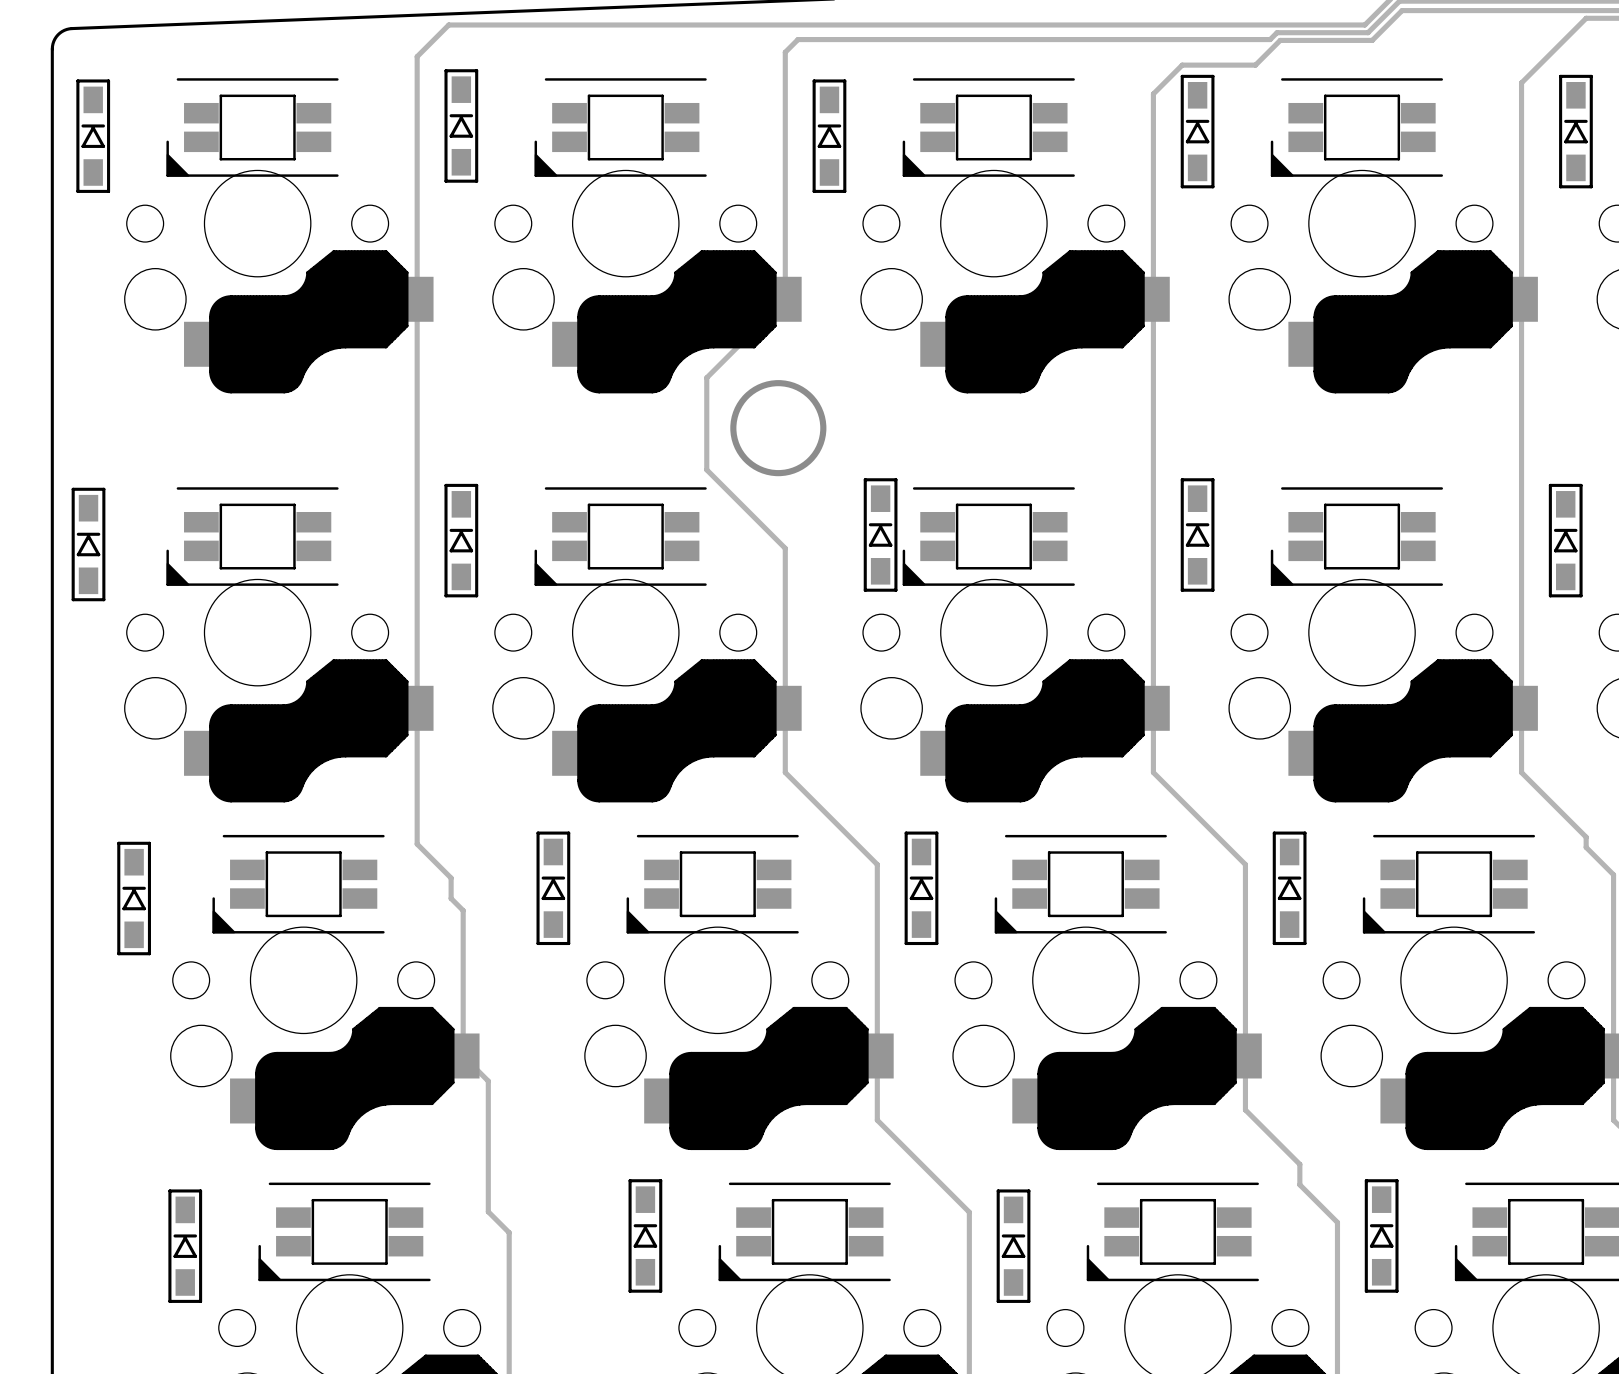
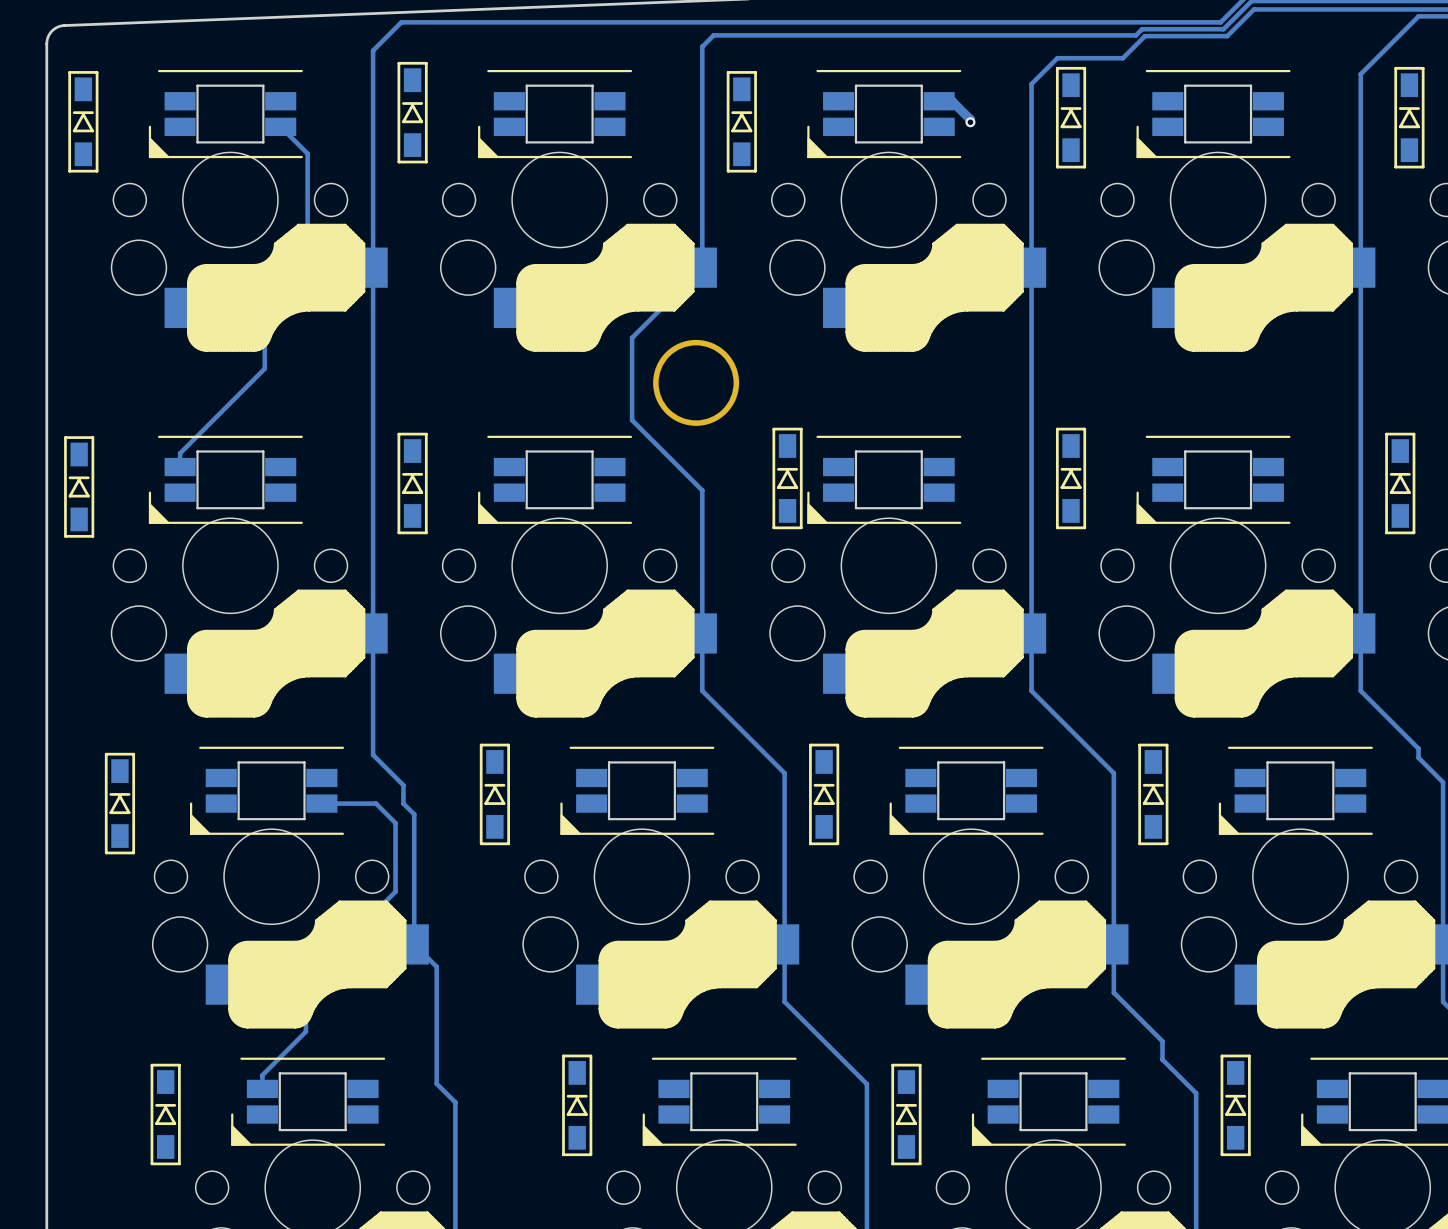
track: none -> (939, 101) (952, 101) (970, 119) (970, 122)
via: none -> (970, 122)
track: none -> (280, 126) (307, 153) (307, 231) (264, 274) (264, 368) (180, 453) (180, 467)
track: none -> (321, 803) (376, 803) (395, 823) (395, 891) (378, 908) (350, 908) (305, 952) (305, 1031) (262, 1075) (262, 1088)

